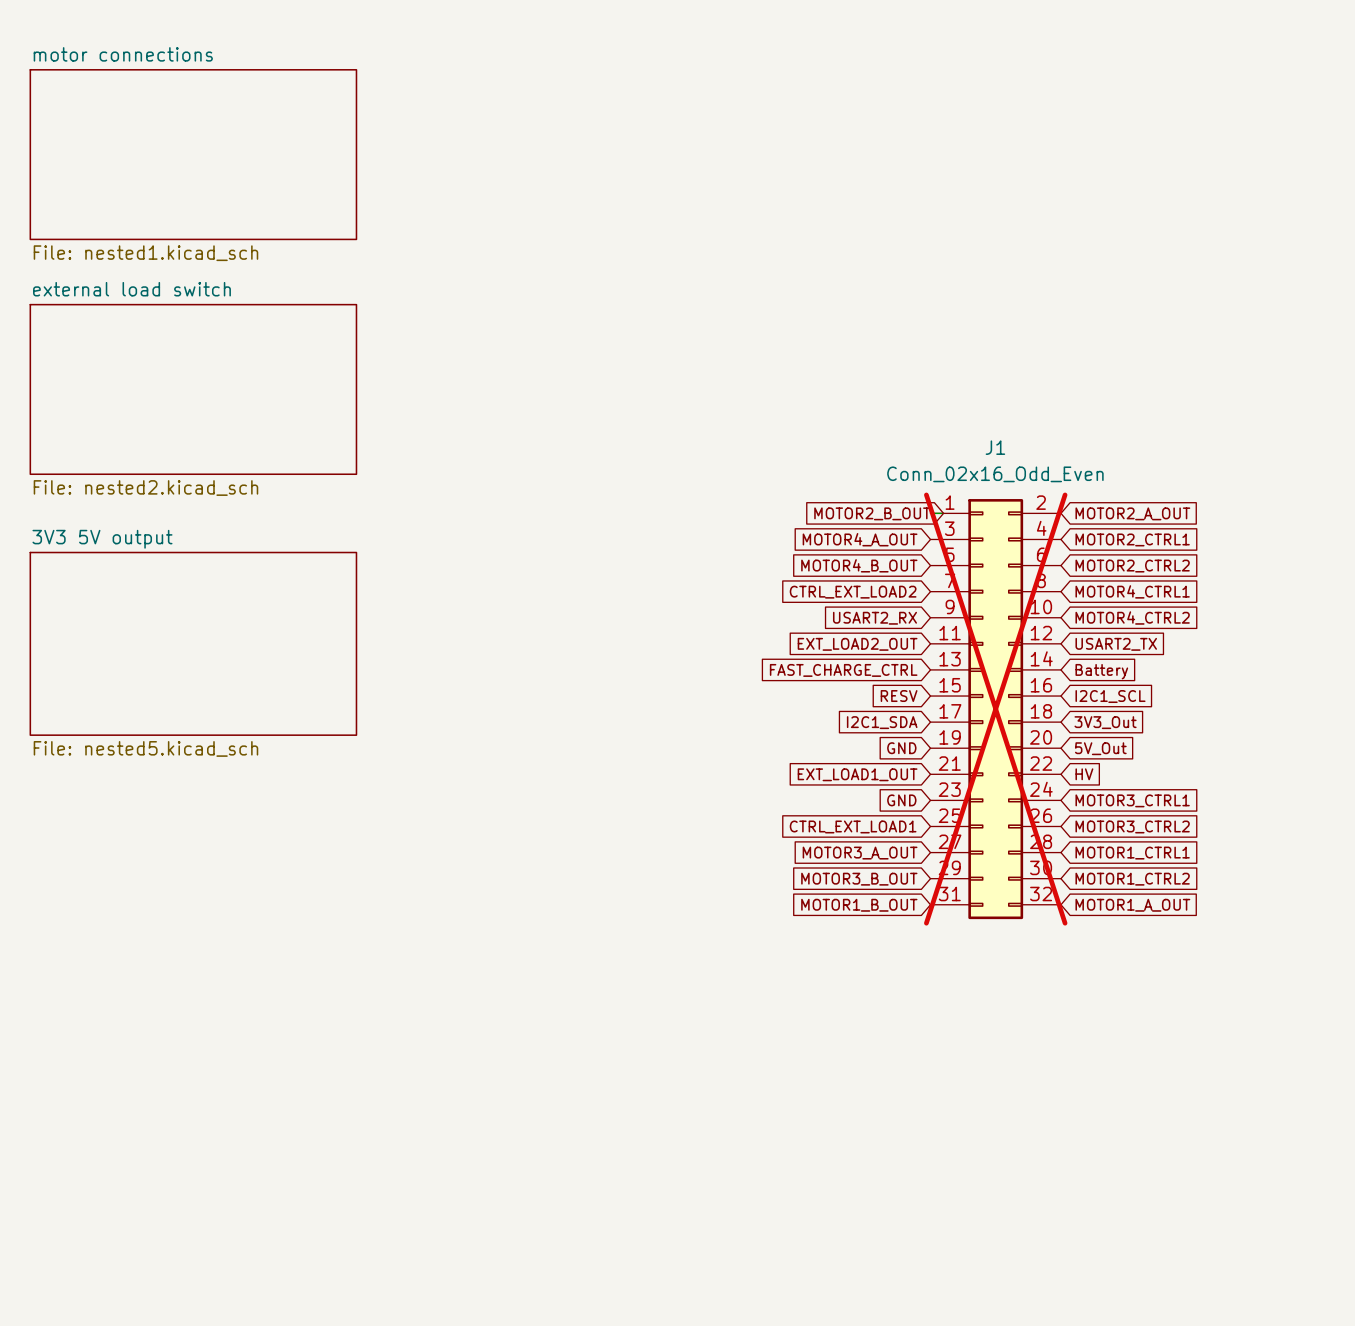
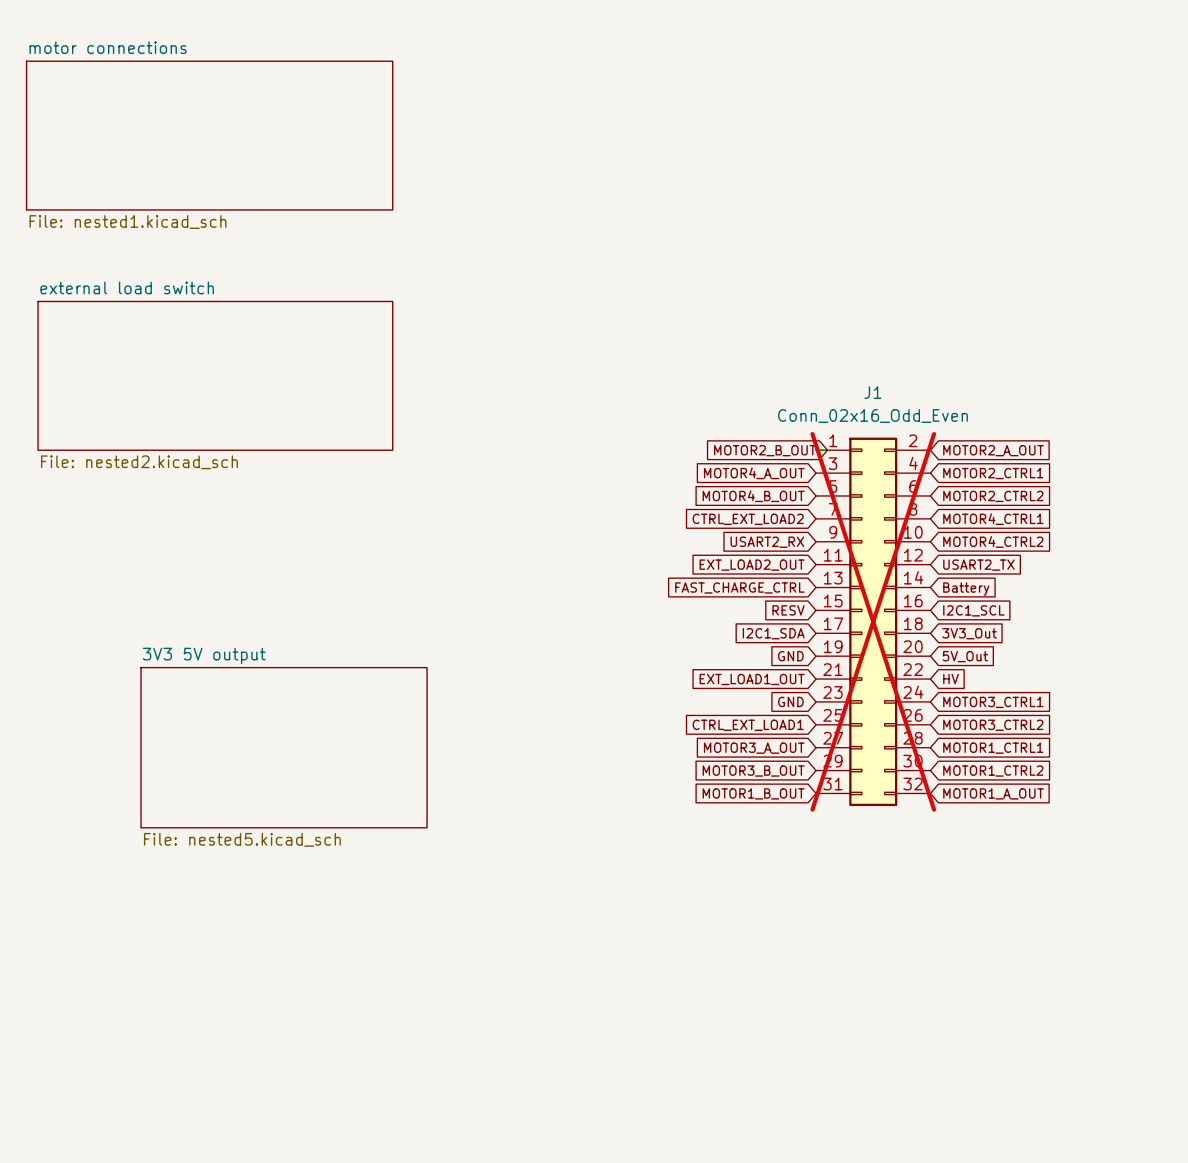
sheet motor connections: File: nested1.kicad_sch (193, 154) -> none
sheet motor connections: none -> File: nested1.kicad_sch (209, 135)
sheet external load switch: File: nested2.kicad_sch (193, 389) -> none
sheet external load switch: none -> File: nested2.kicad_sch (215, 375)
sheet 3V3 5V output position: (193, 643) -> (284, 747)

